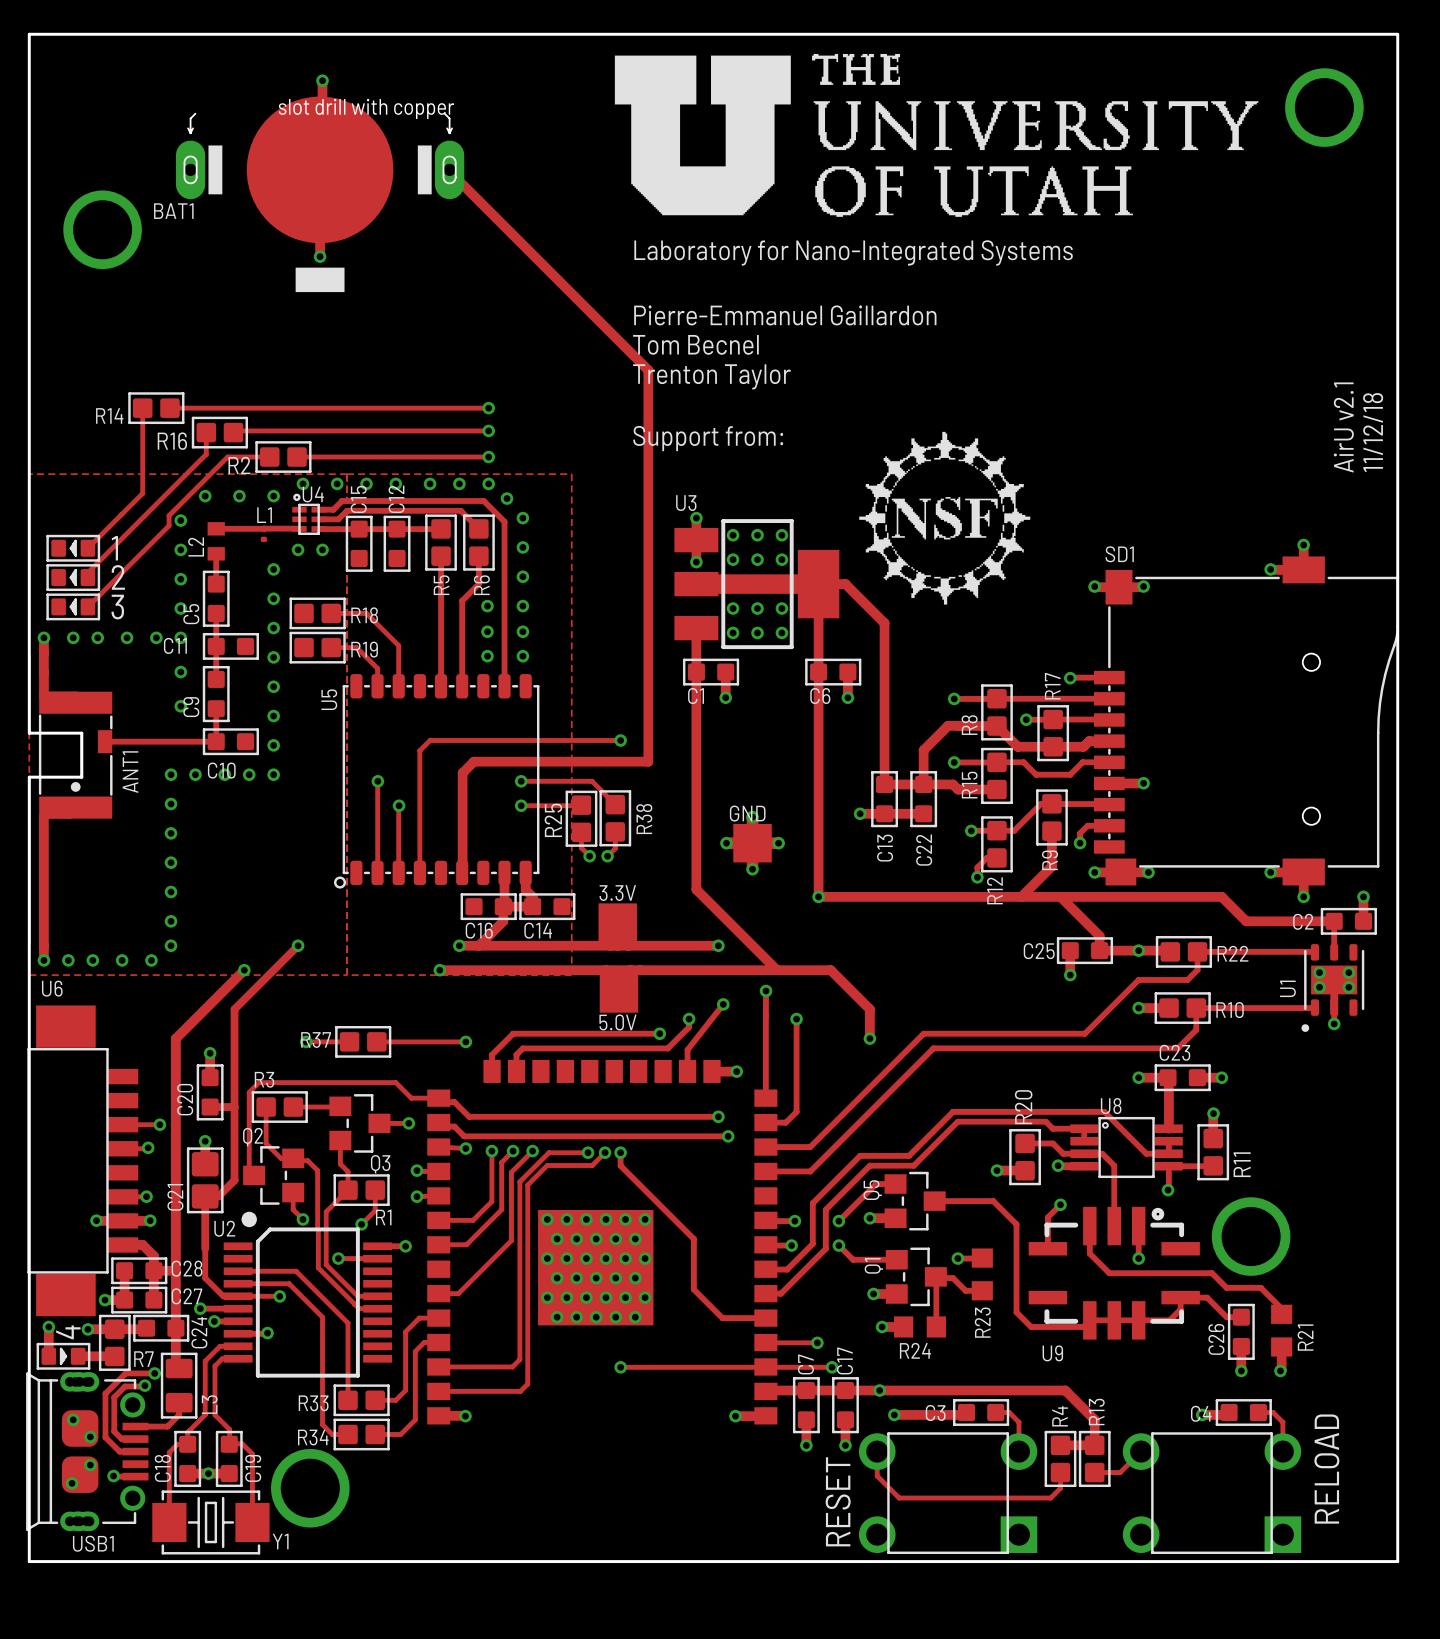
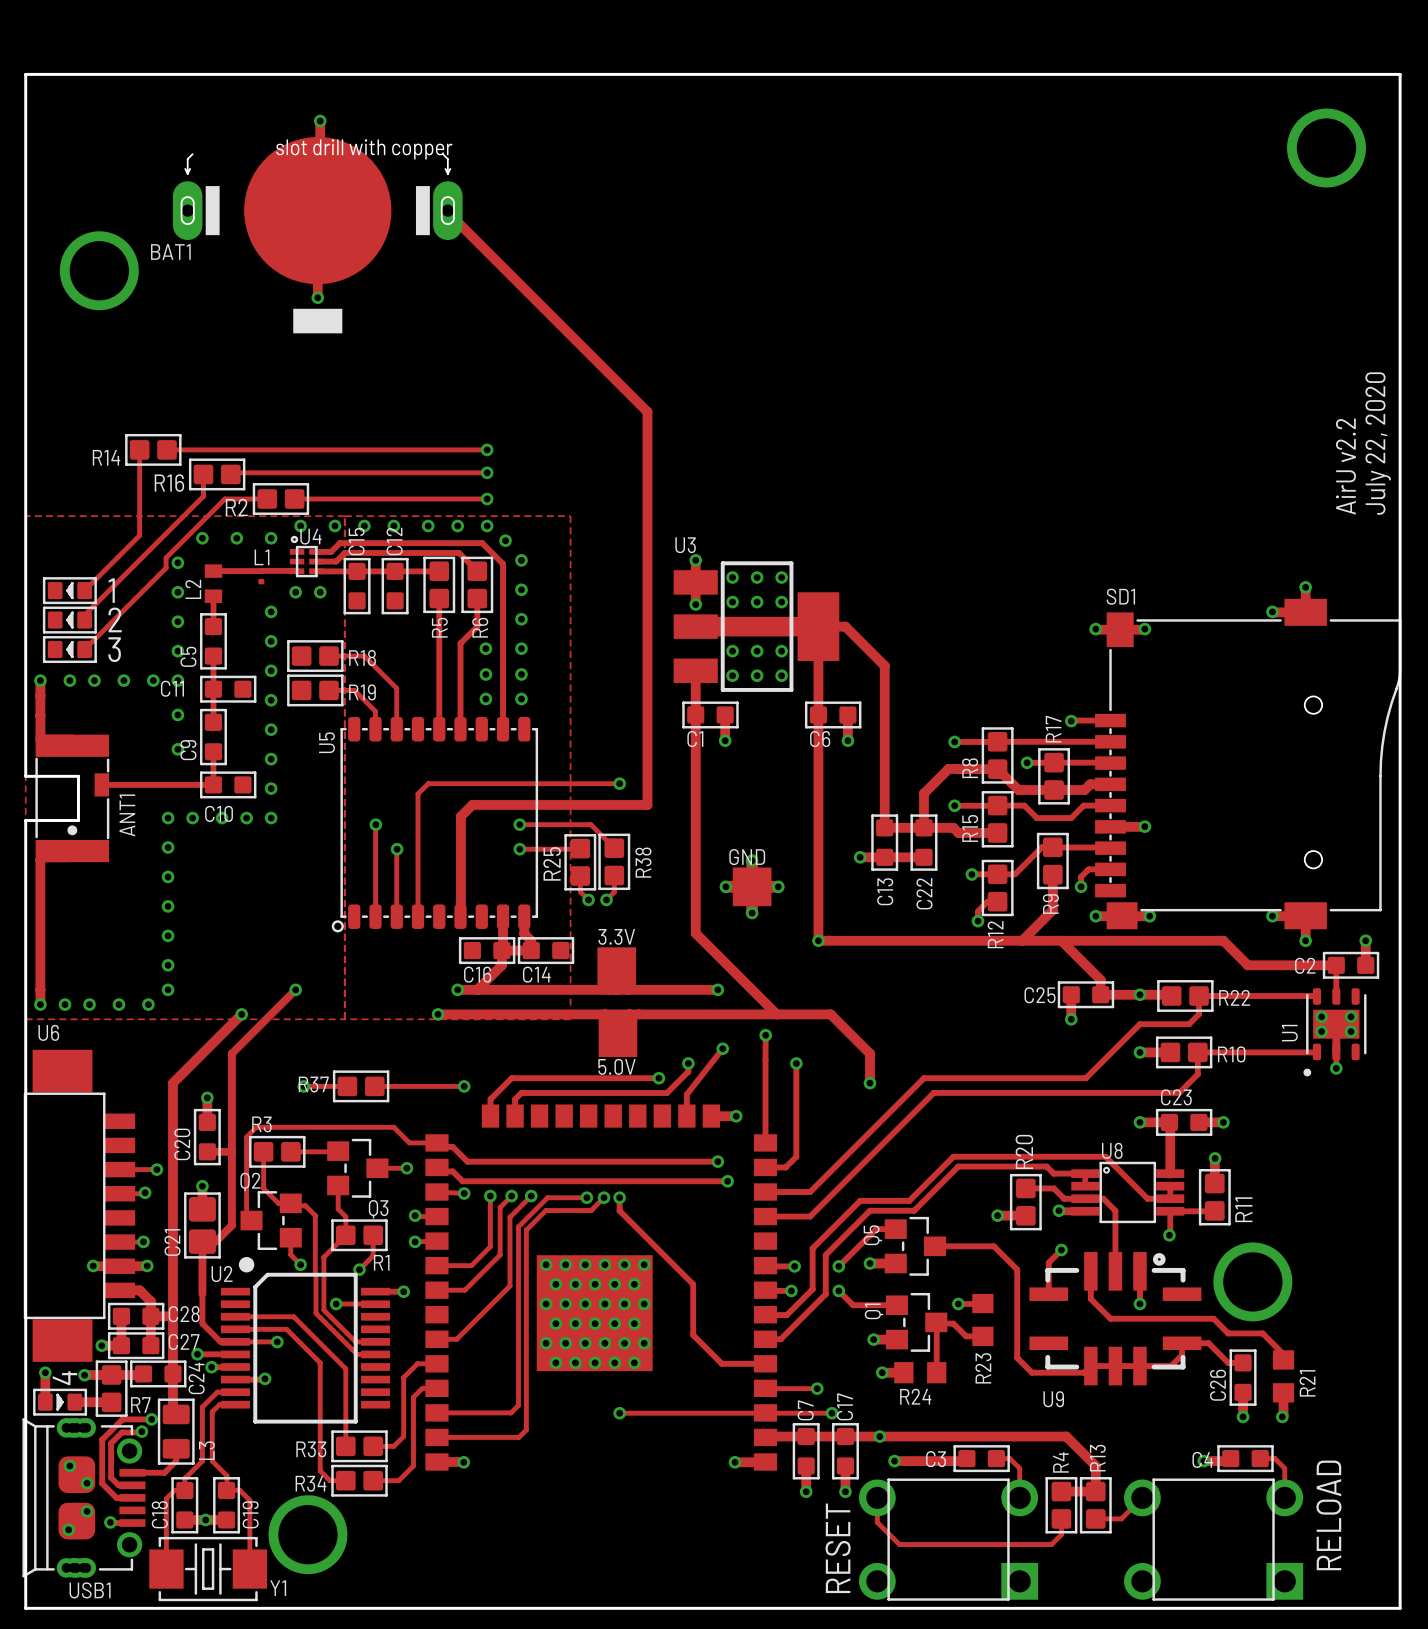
drawing: [614, 53, 1259, 217] -> none
text: Laboratory for Nano-Integrated Systems (853, 252) -> none
text: Pierre-Emmanuel Gaillardon (785, 315) -> none
text: Tom Becnel (695, 344) -> none
text: Trenton Taylor (711, 376) -> none
text: AirU v2.1 (1343, 427) -> AirU v2.2 (1345, 466)
drawing: [859, 431, 1031, 605] -> none
text: 11/12/18 (1373, 432) -> July 22, 2020 (1378, 443)
text: Support from: (708, 438) -> none

